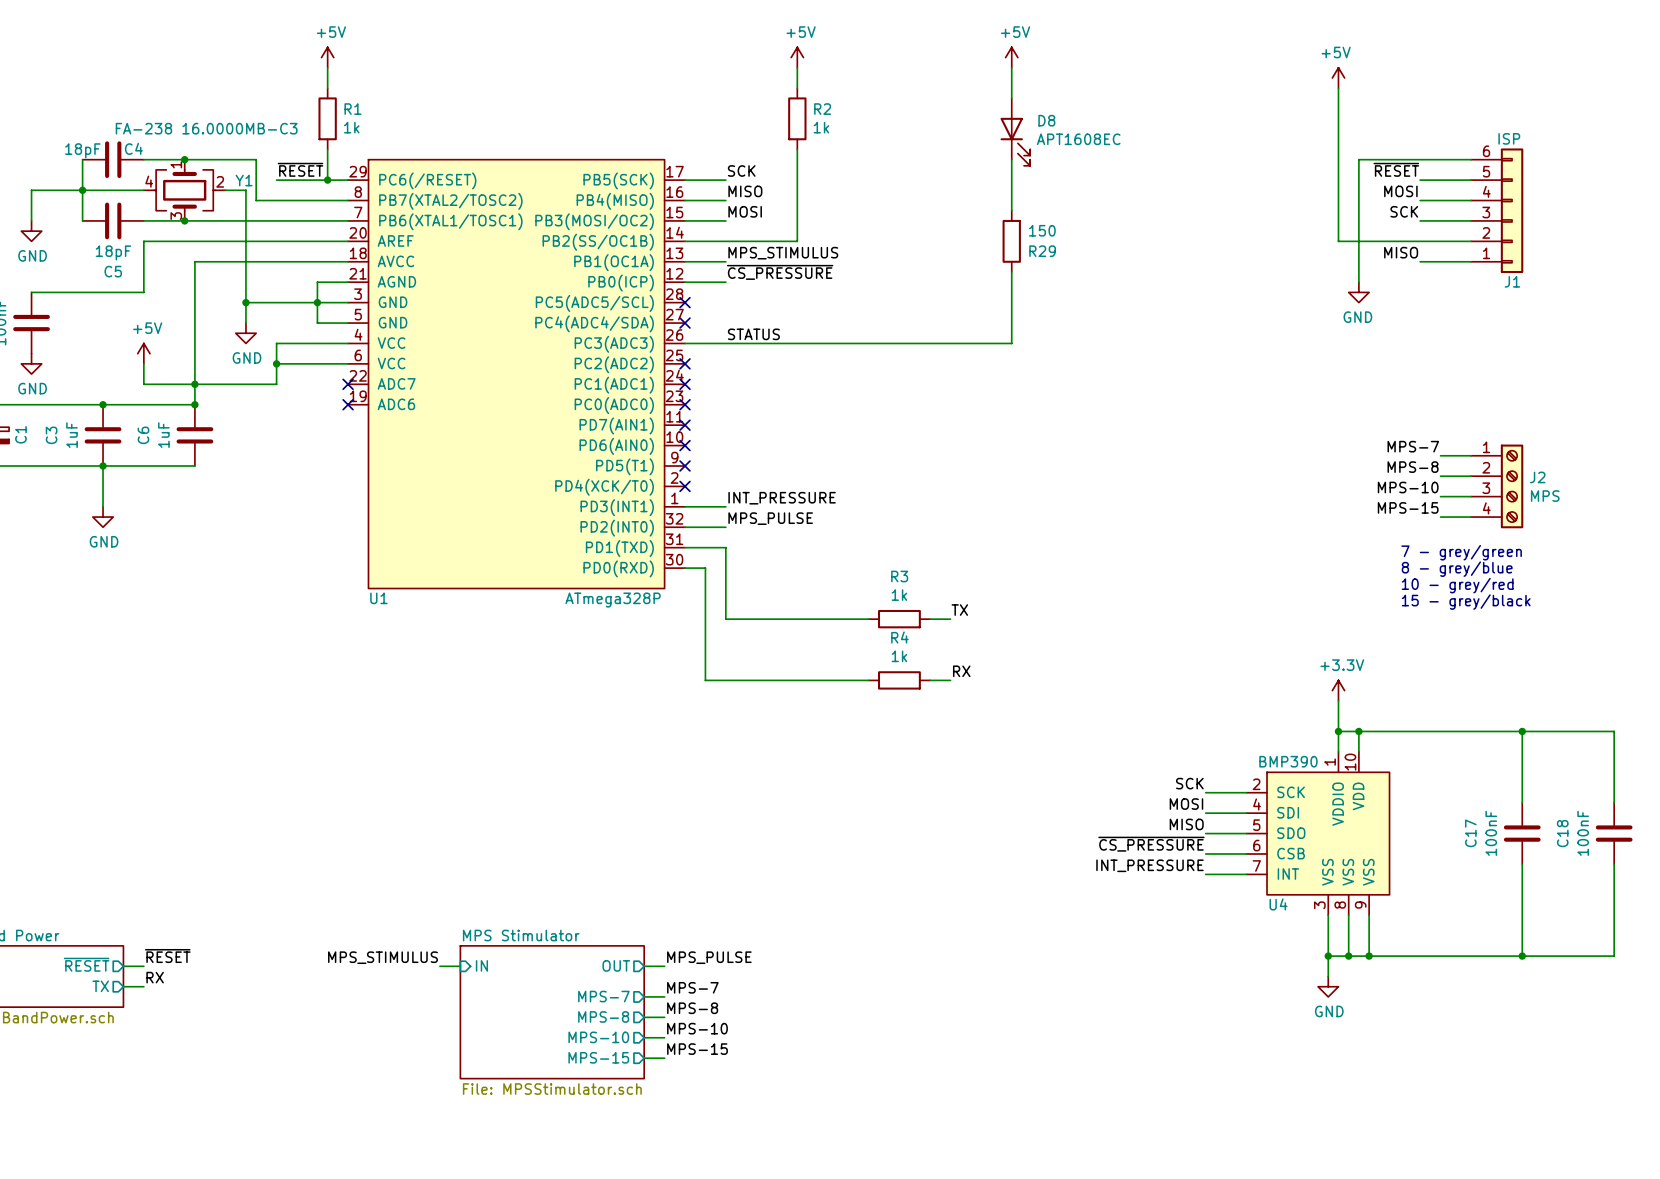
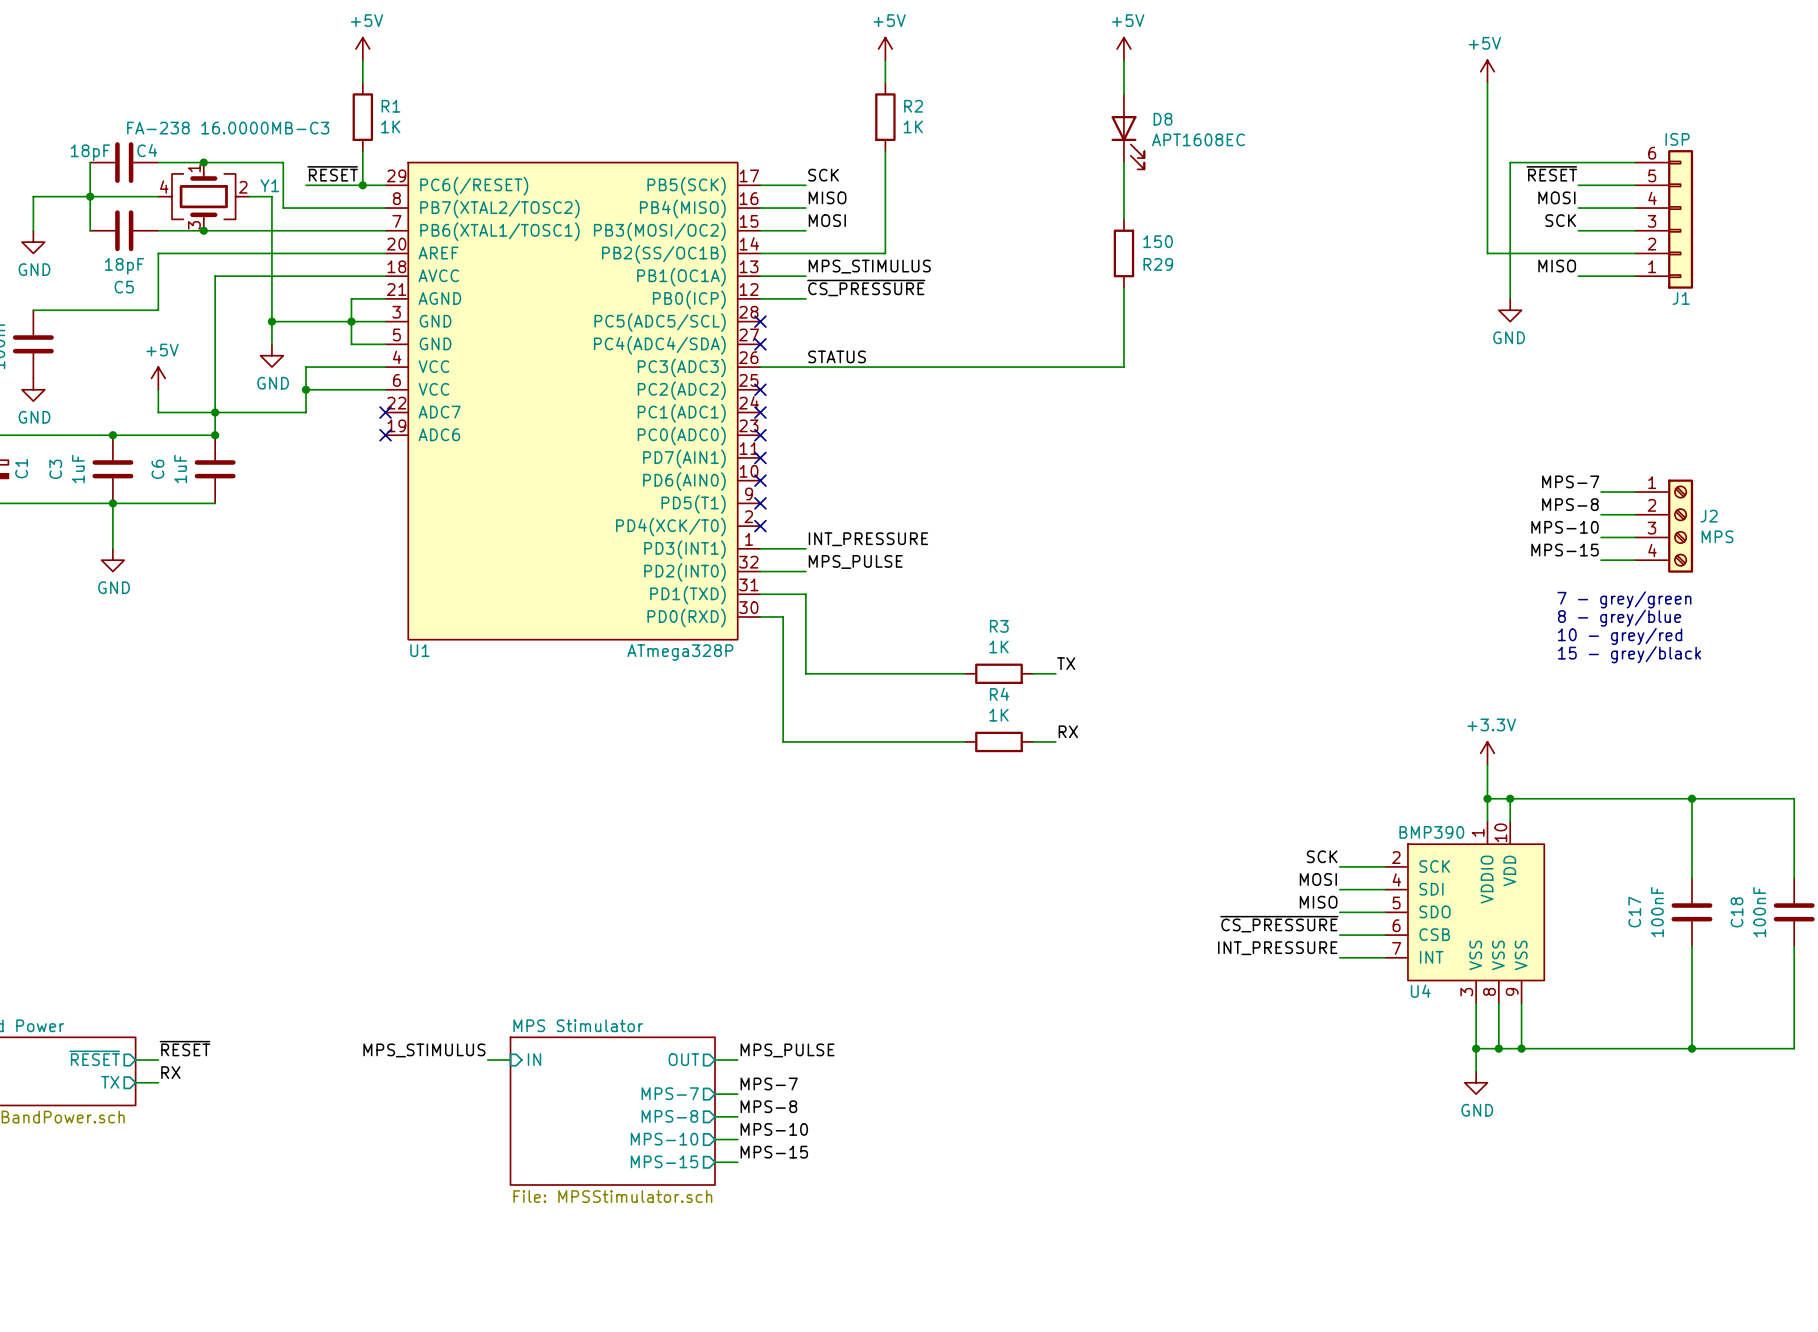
R1 value: 1k (351, 127) -> 1K (390, 126)
R2 value: 1k (821, 127) -> 1K (913, 126)
R3 value: 1k (899, 595) -> 1K (998, 647)
R4 value: 1k (899, 656) -> 1K (998, 715)

